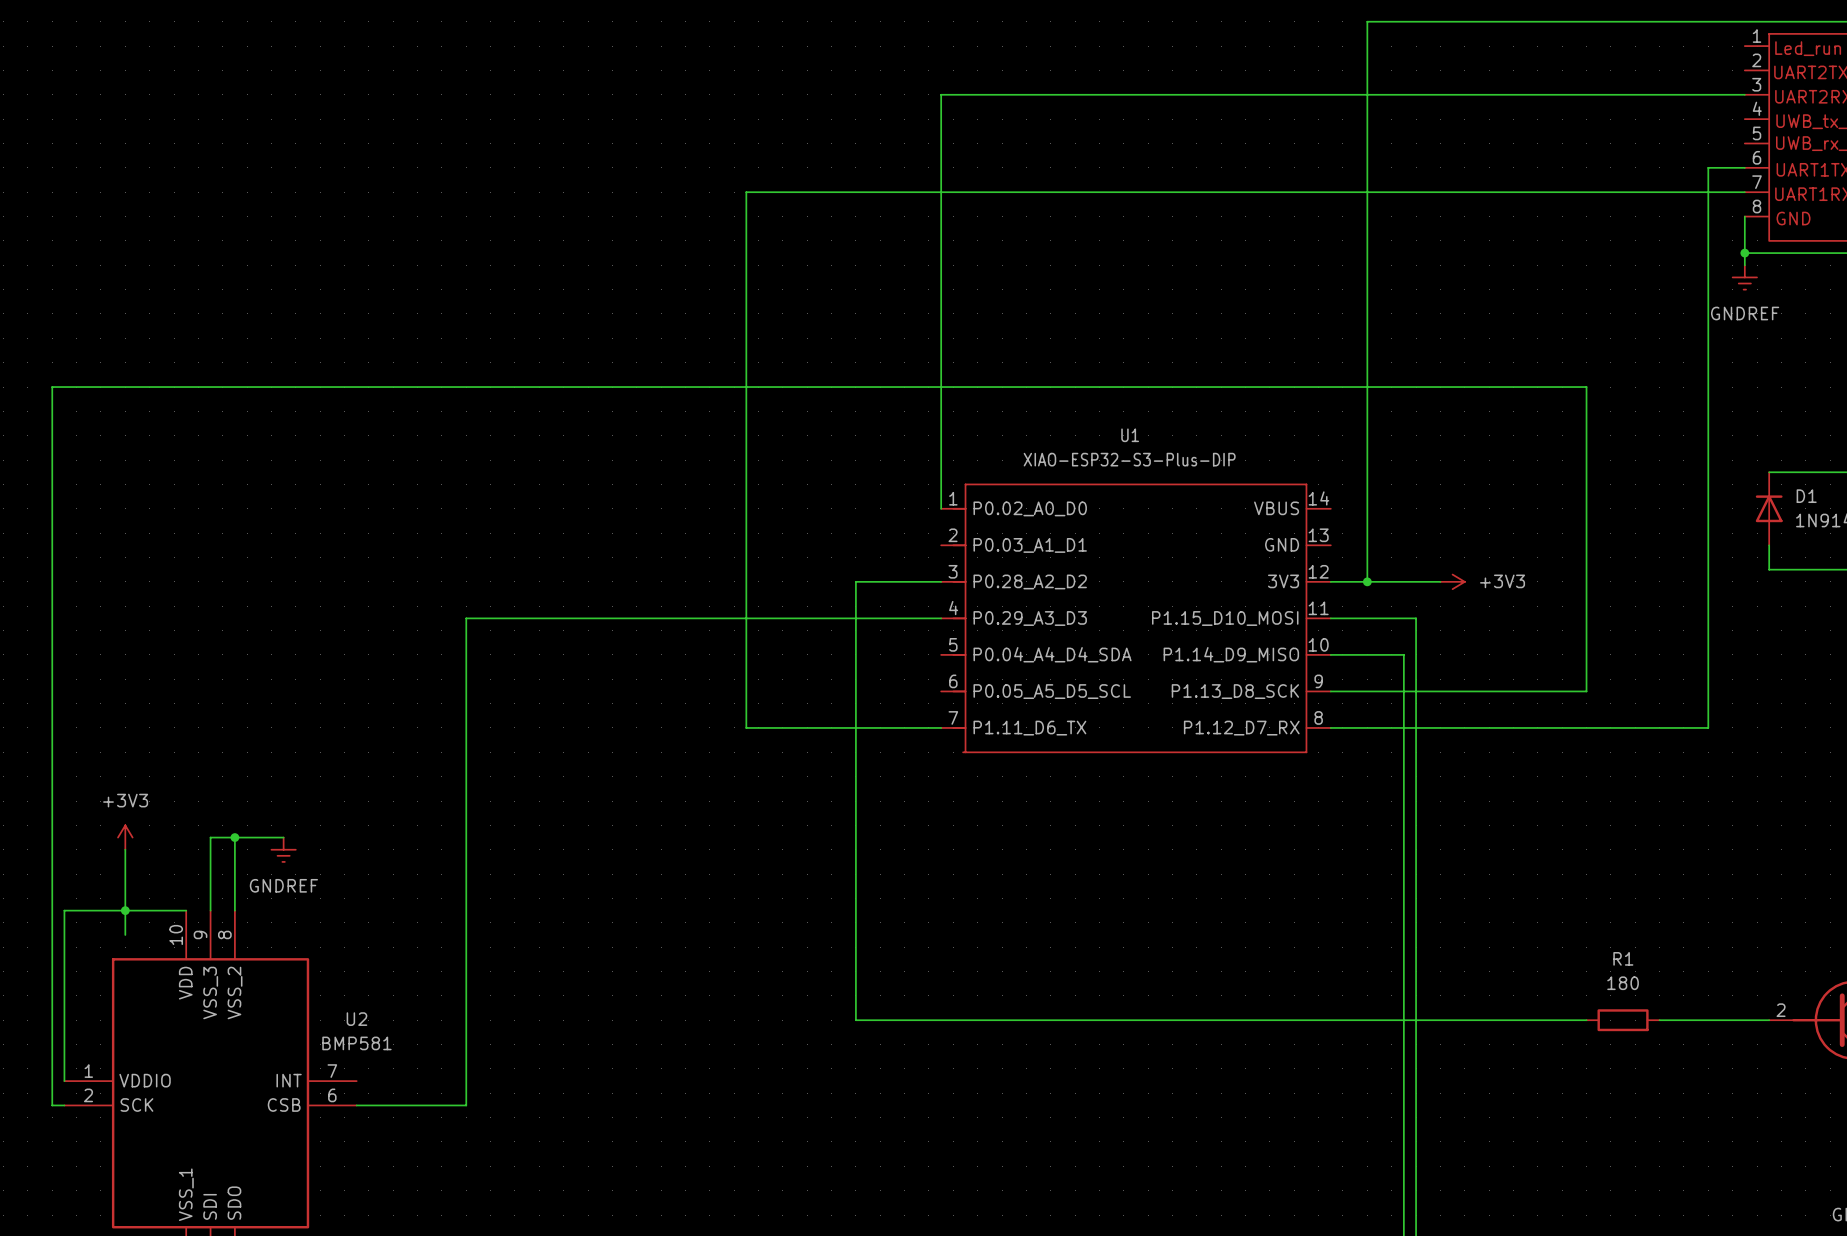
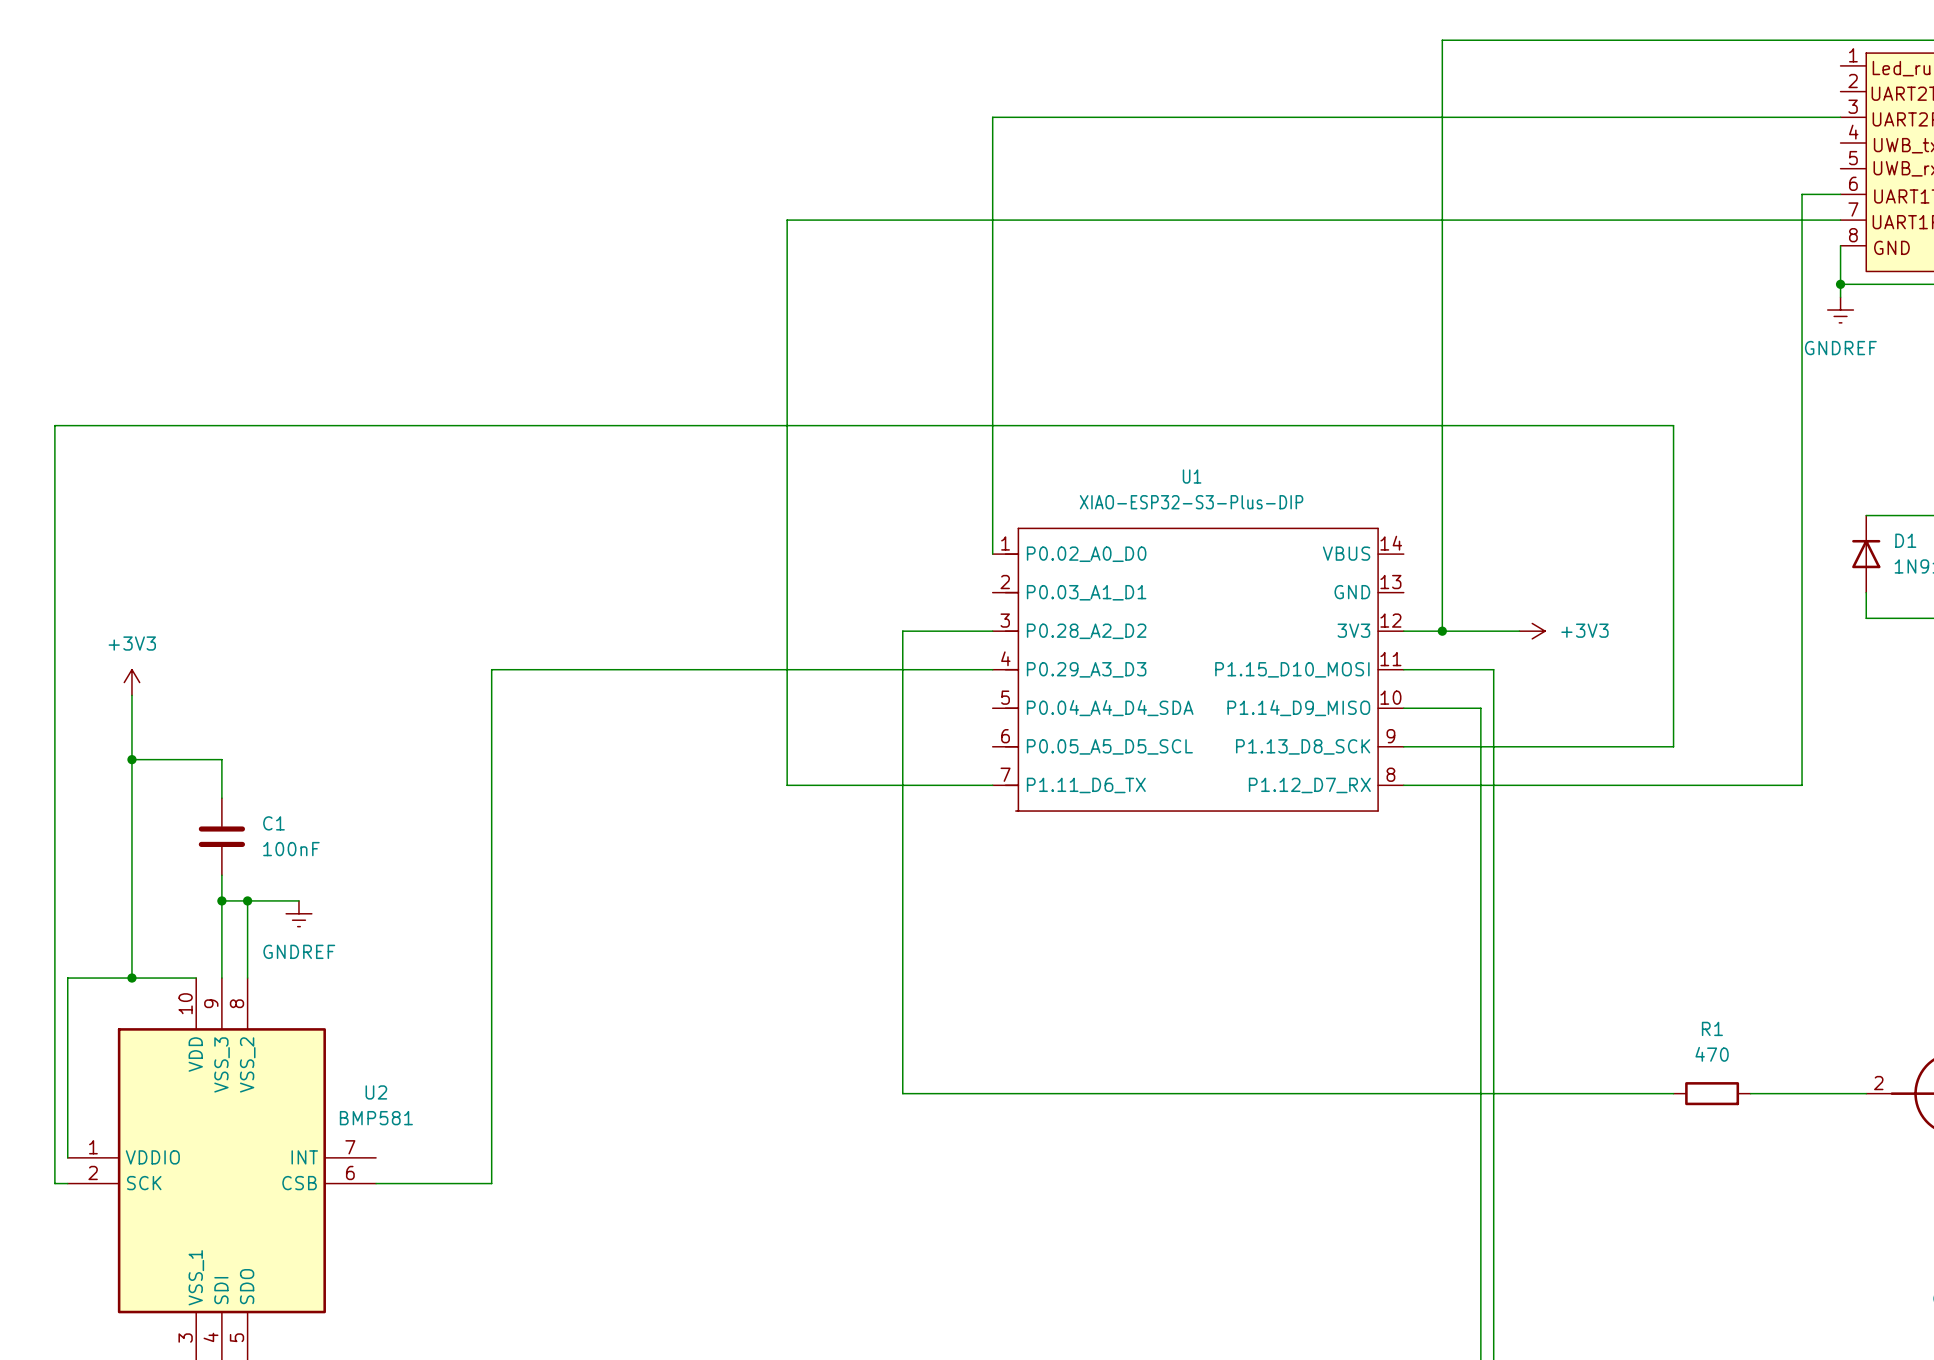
wire: none -> (131, 695) (131, 913)
wire: none -> (131, 759) (221, 759) (221, 798)
junction: none -> (131, 759)
C1: none -> 100nF (221, 836)
power symbol position: +3V3 (125, 837) -> +3V3 (131, 682)
junction: none -> (221, 900)
wire: (125, 910) (125, 934) -> (221, 875) (221, 900)
R1 value: 180 (1623, 983) -> 470 (1712, 1054)

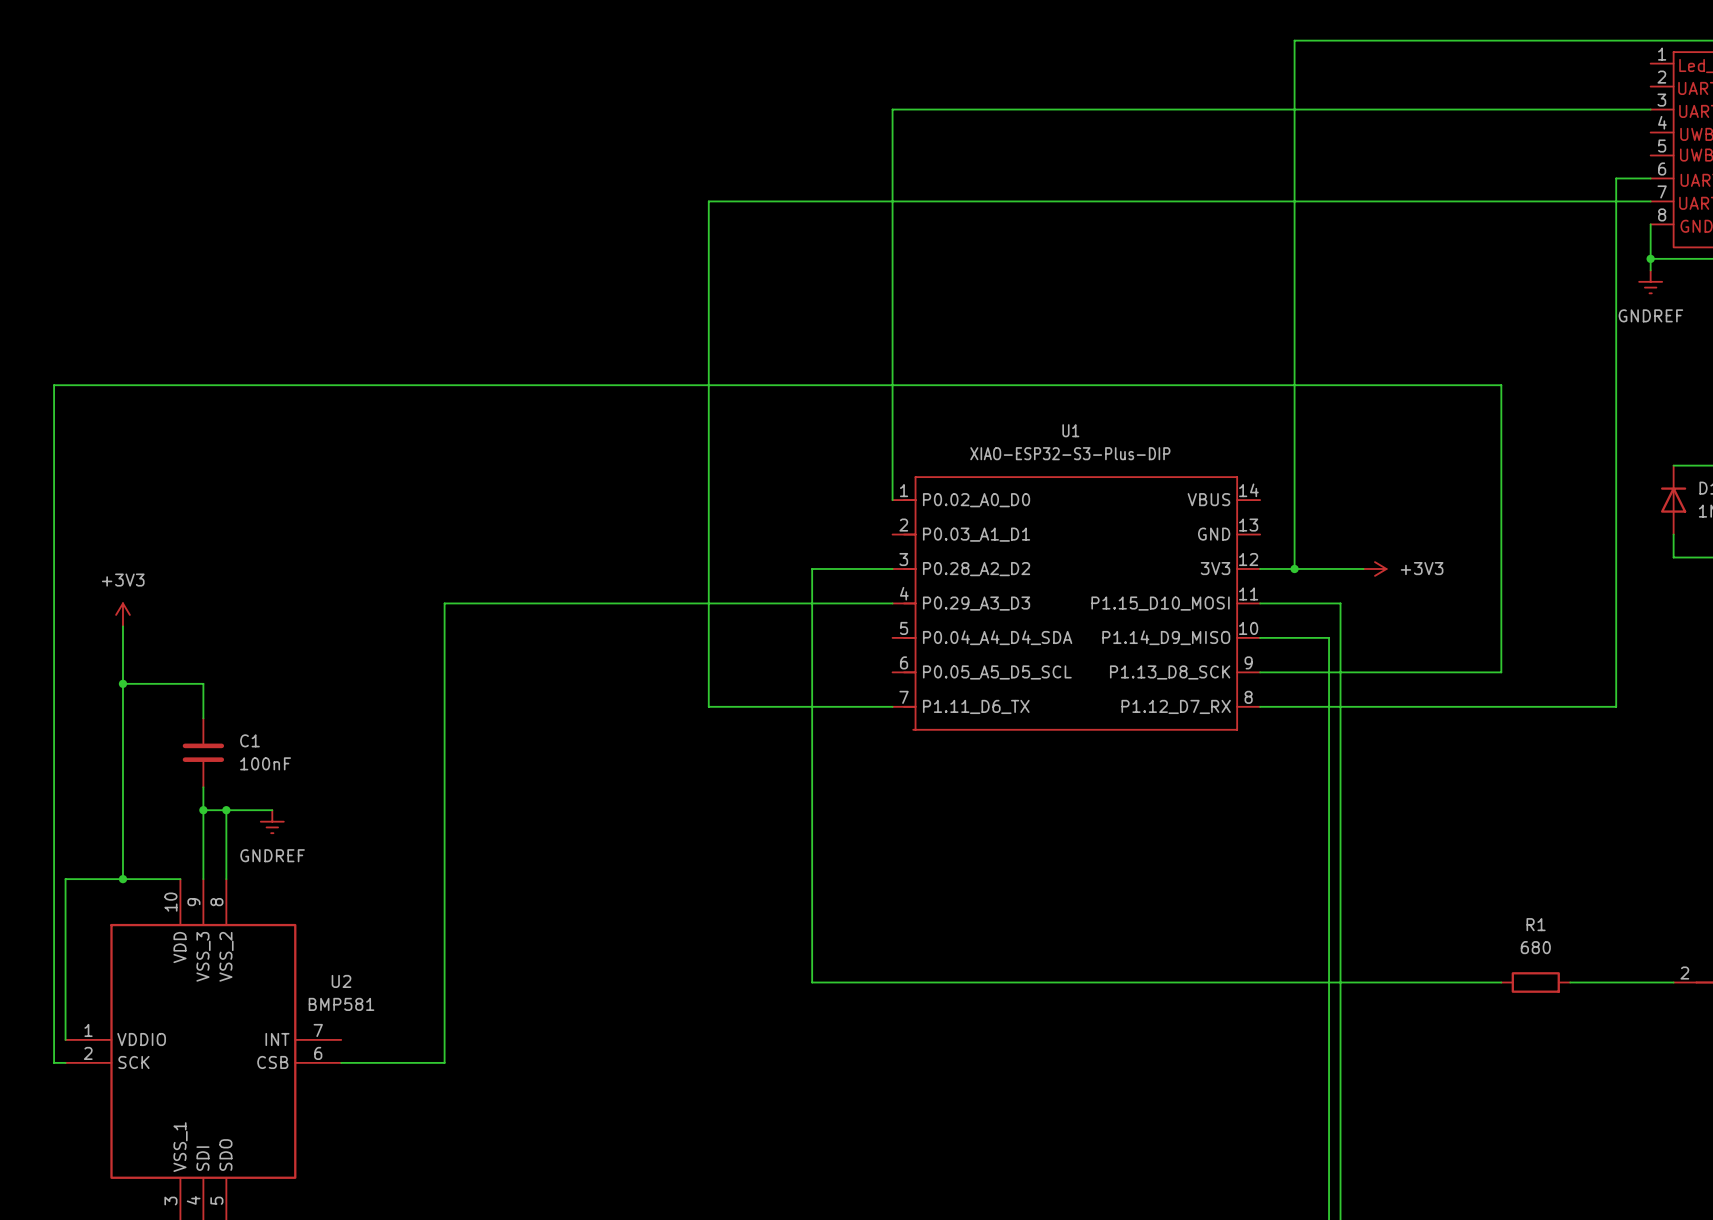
R1 value: 470 (1712, 1054) -> 680 (1535, 947)

